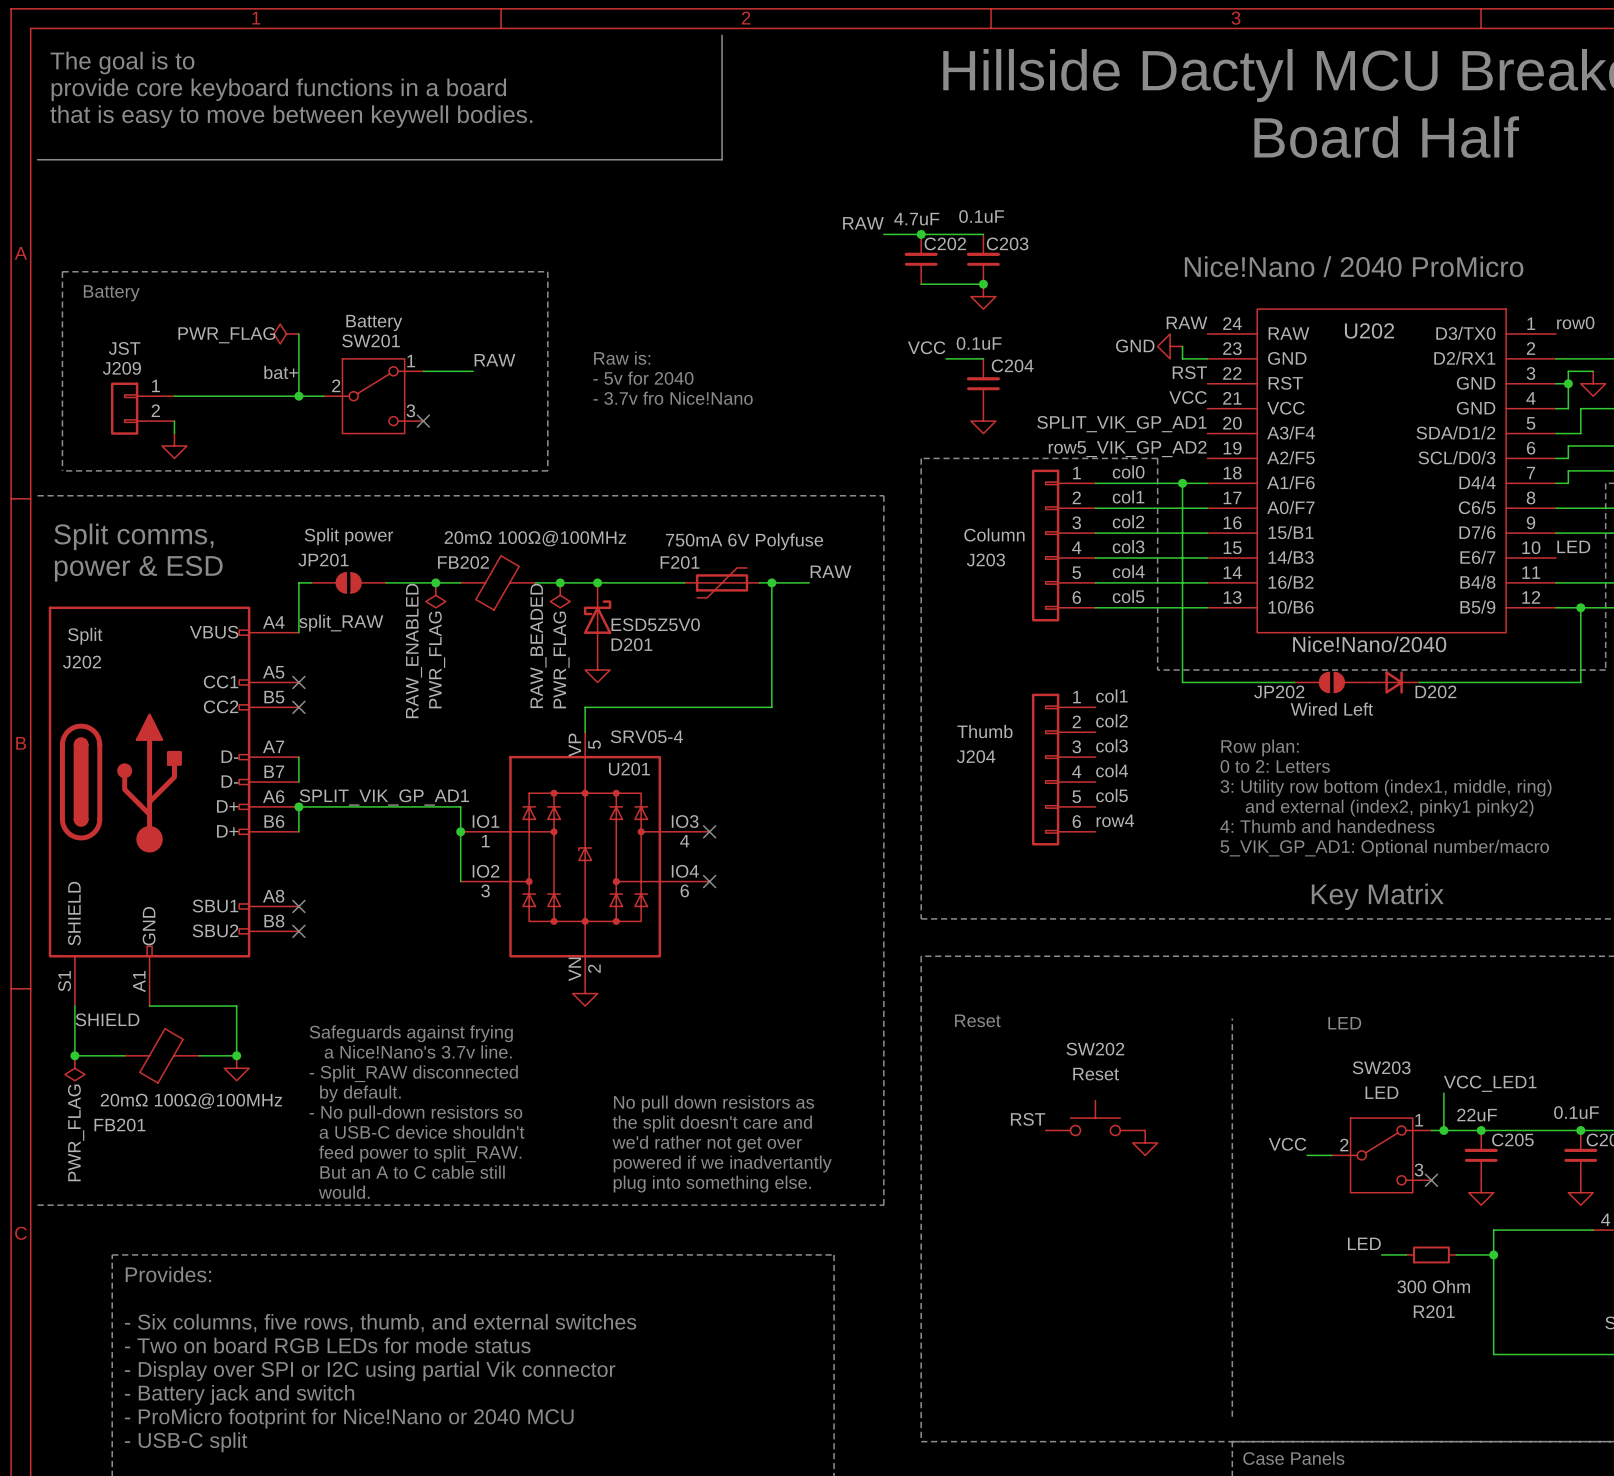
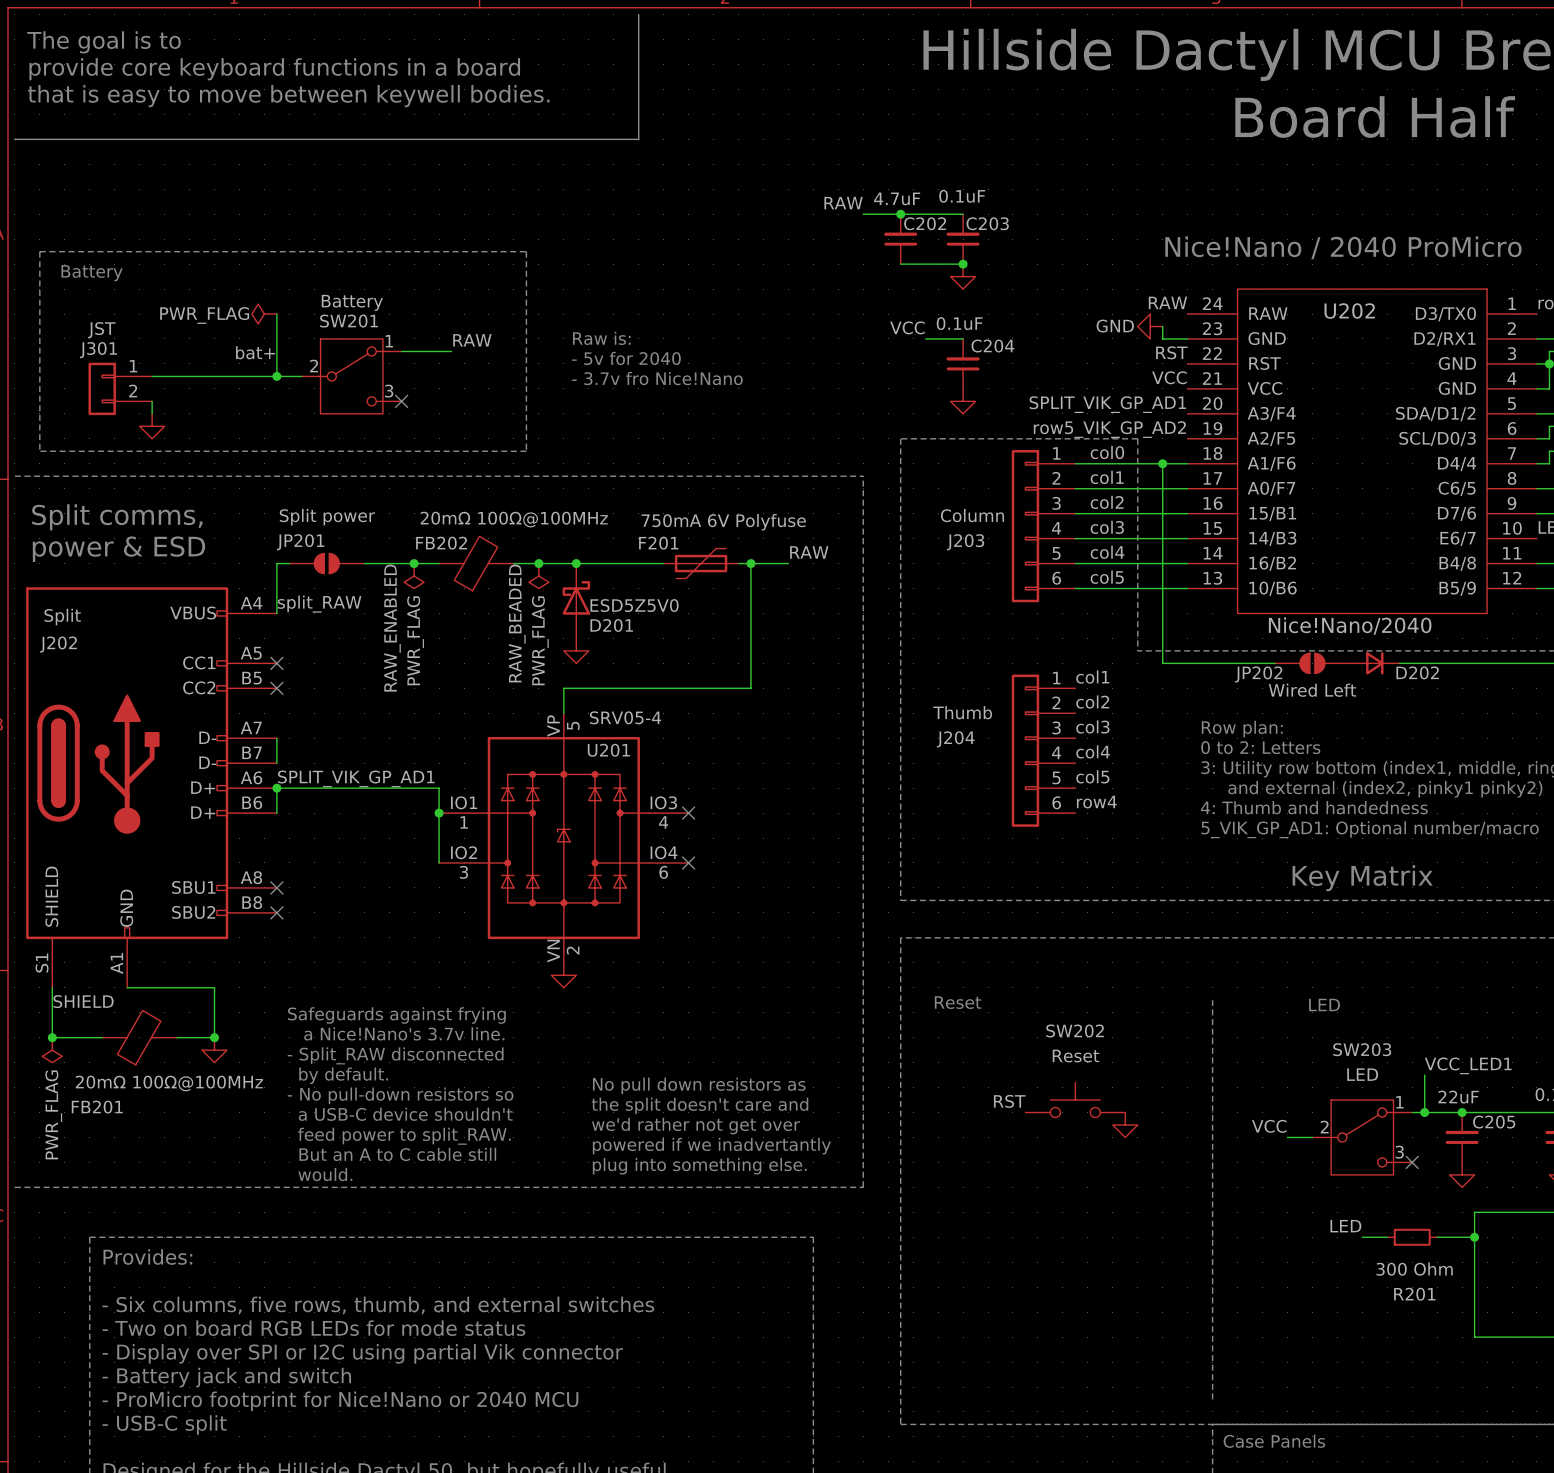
line: (722, 35) (722, 159) (659, 159) -> (638, 14) (638, 139)
J209 name: J209 (121, 368) -> J301 (98, 350)

